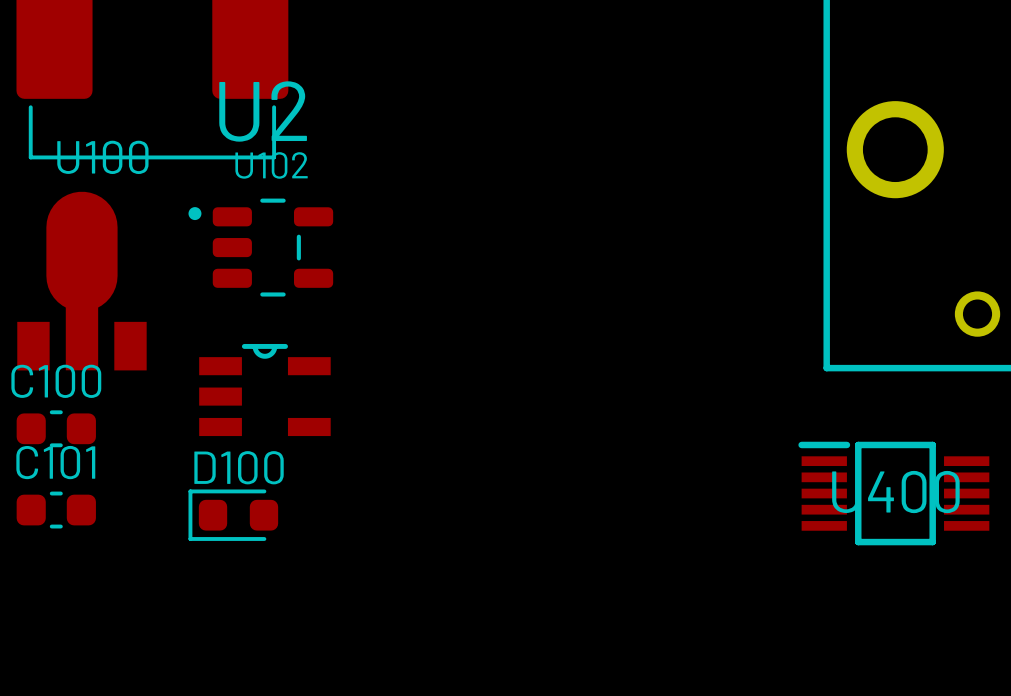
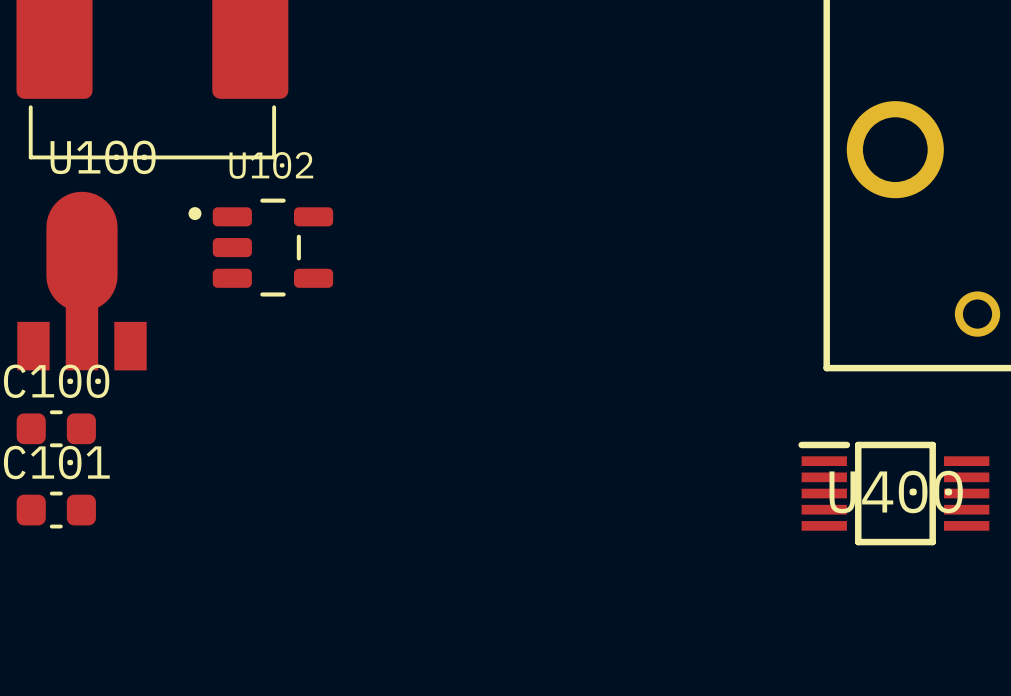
U2: (264, 390) -> none
D100: (233, 515) -> none

